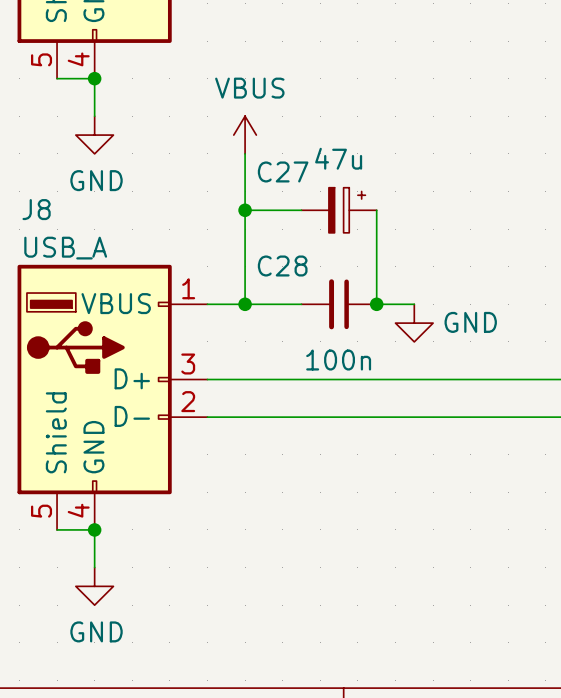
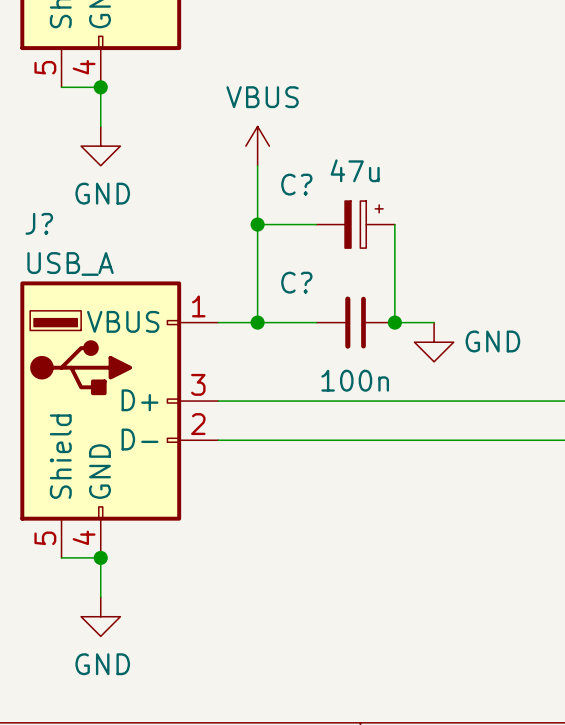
C27 name: C27 (283, 171) -> C? (296, 184)
J8 name: J8 (36, 209) -> J? (39, 223)
C28 name: C28 (282, 265) -> C? (296, 282)

